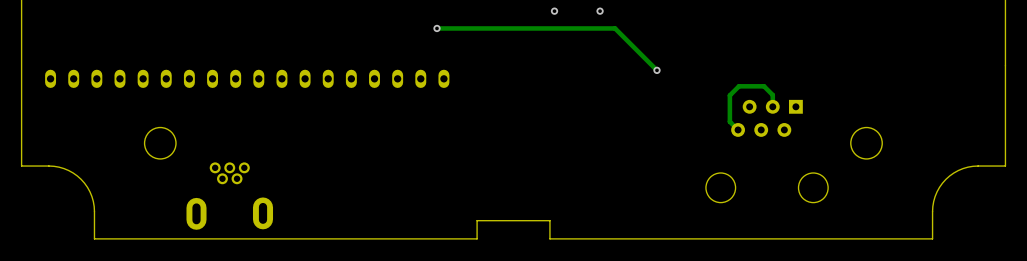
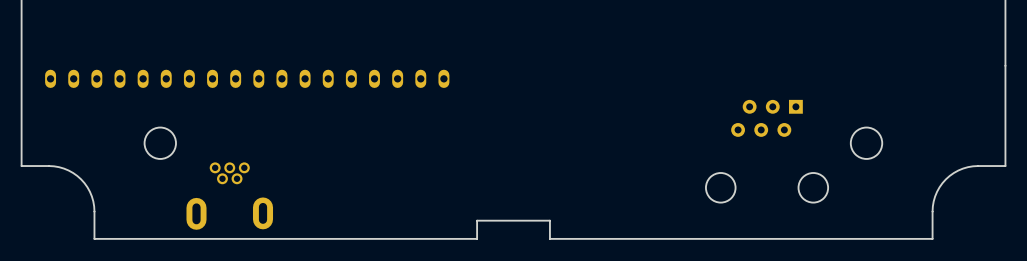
via: (554, 11) -> none
via: (600, 11) -> none
track: (437, 28) (615, 28) (657, 70) -> none
via: (437, 28) -> none
via: (657, 70) -> none
track: (772, 106) (772, 95) (764, 86) (738, 86) (729, 95) (729, 121) (738, 129) -> none

